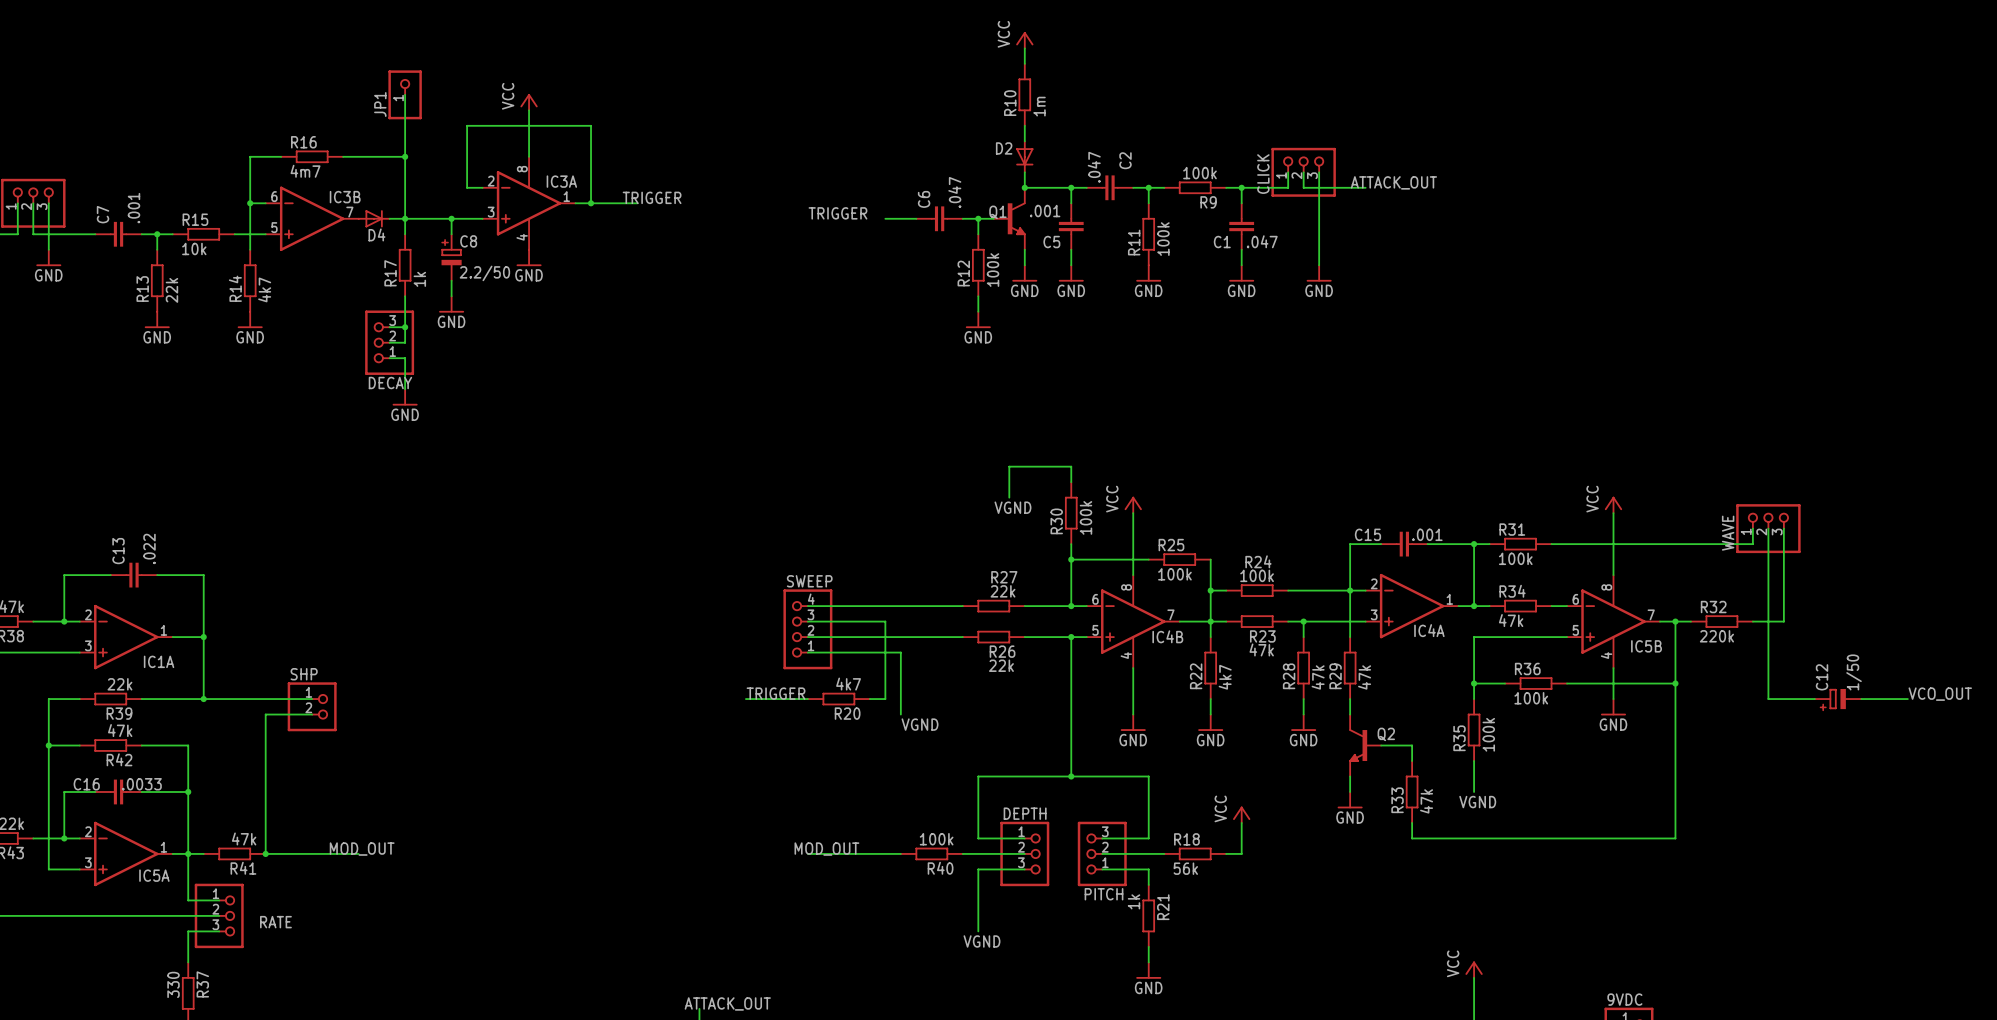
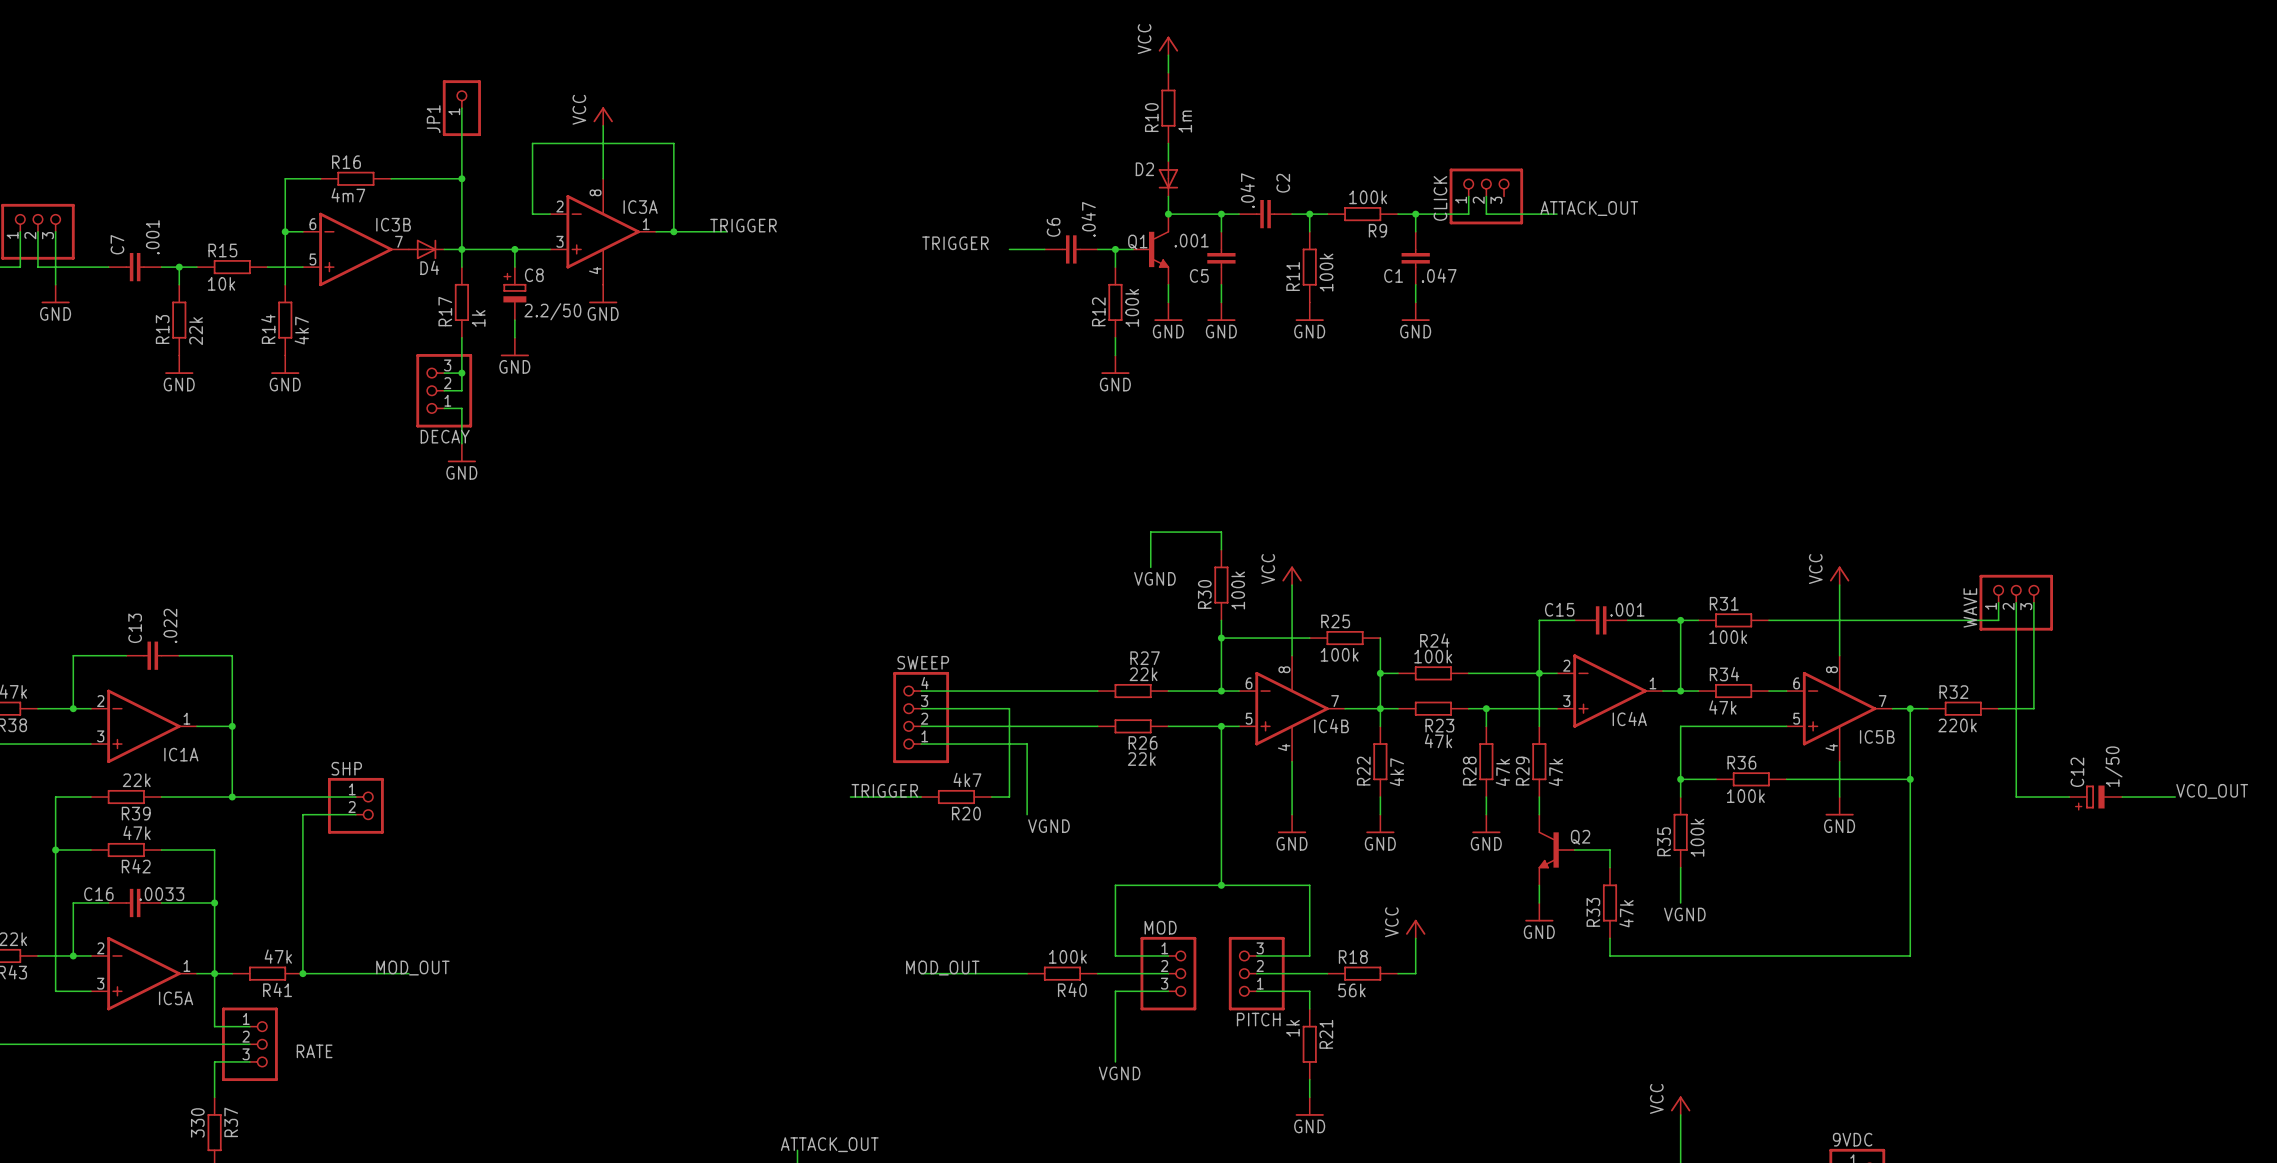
wire: (1319, 172) (1319, 265) -> none
power symbol: GND (1319, 273) -> none
DEPTH name: DEPTH (1025, 813) -> MOD (1160, 927)

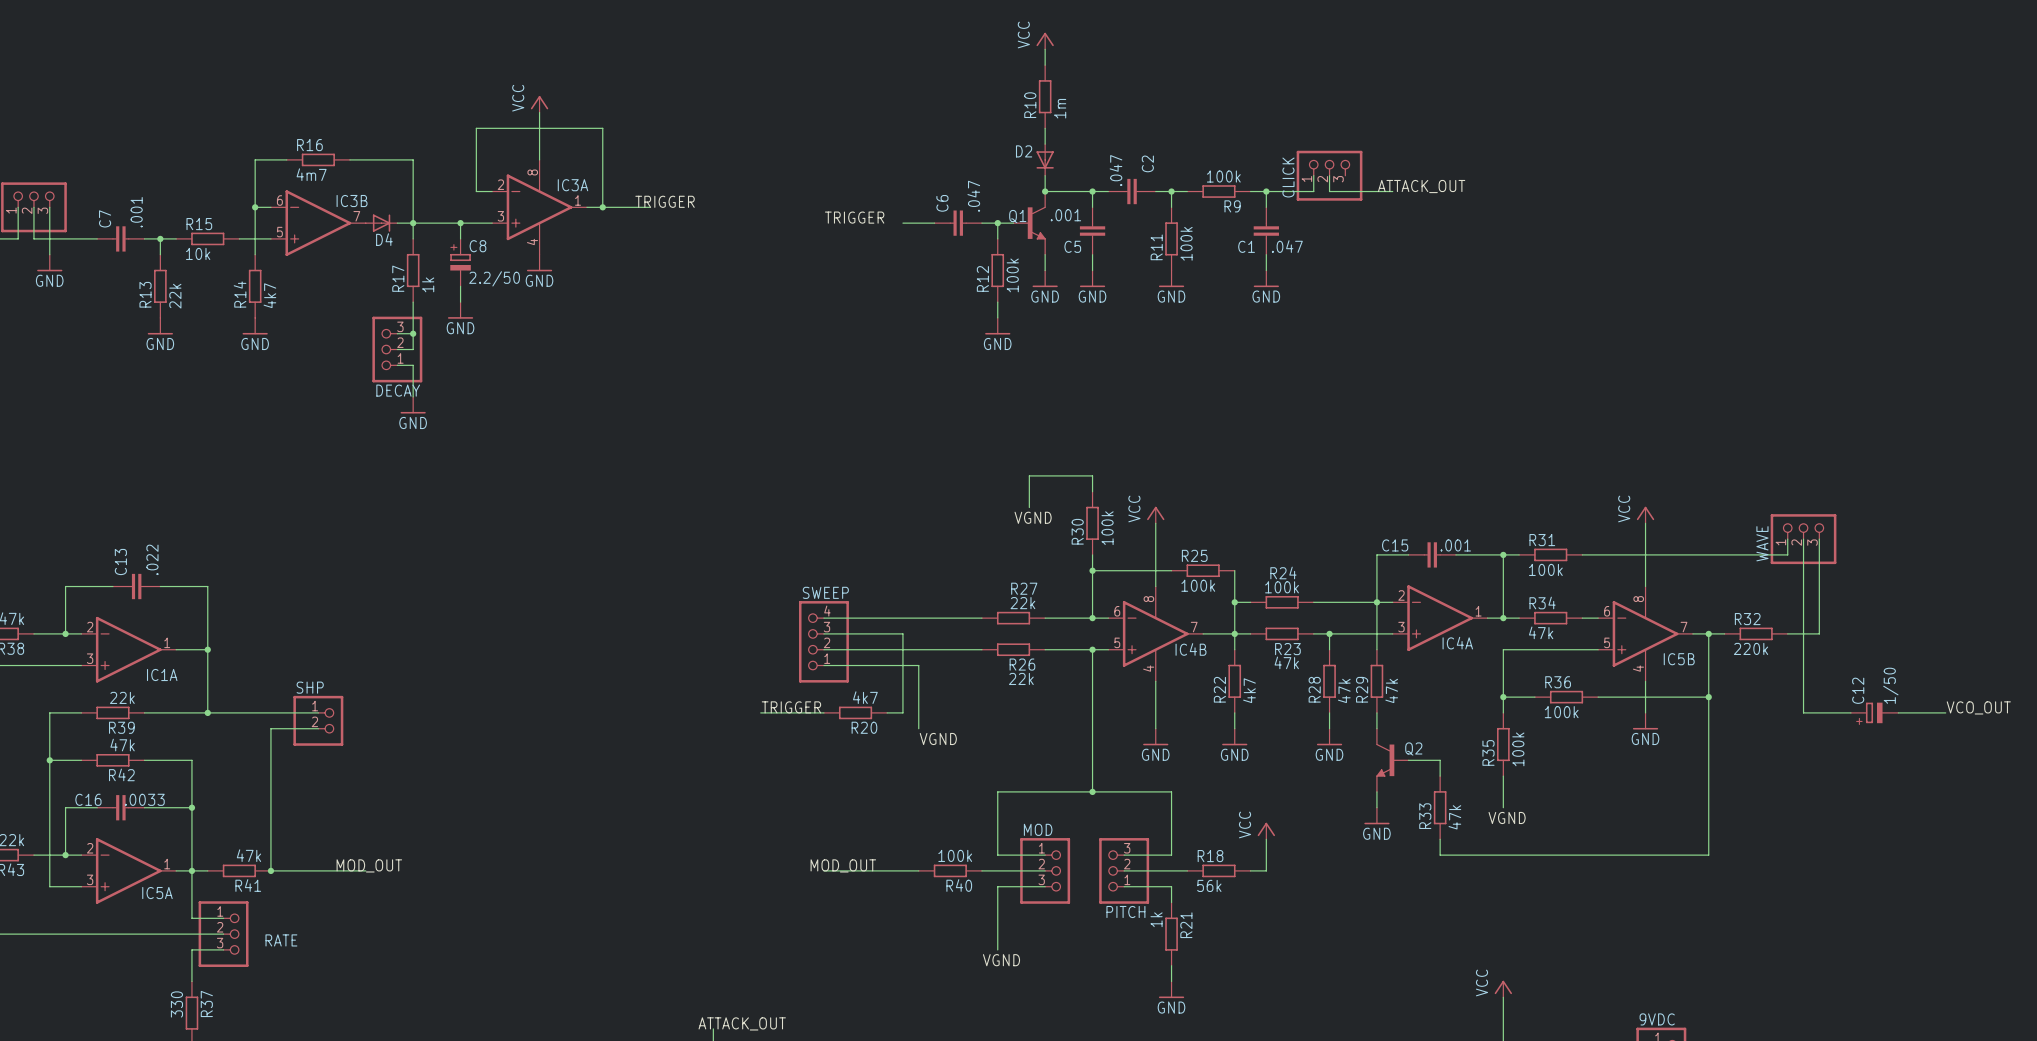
wire: (461, 108) (461, 178) -> none
JP1: (461, 108) -> none
junction: (461, 178) -> none

